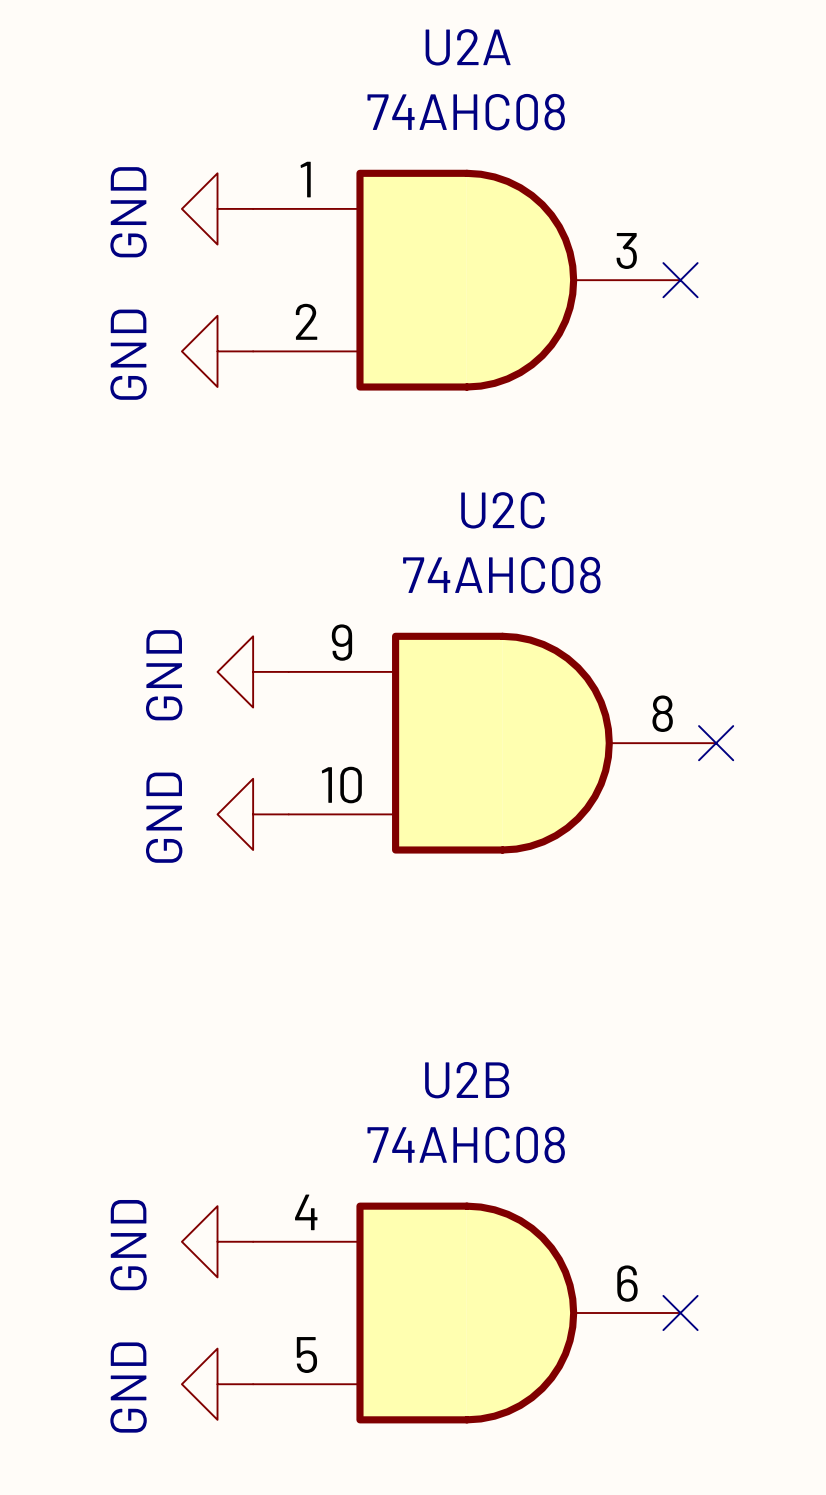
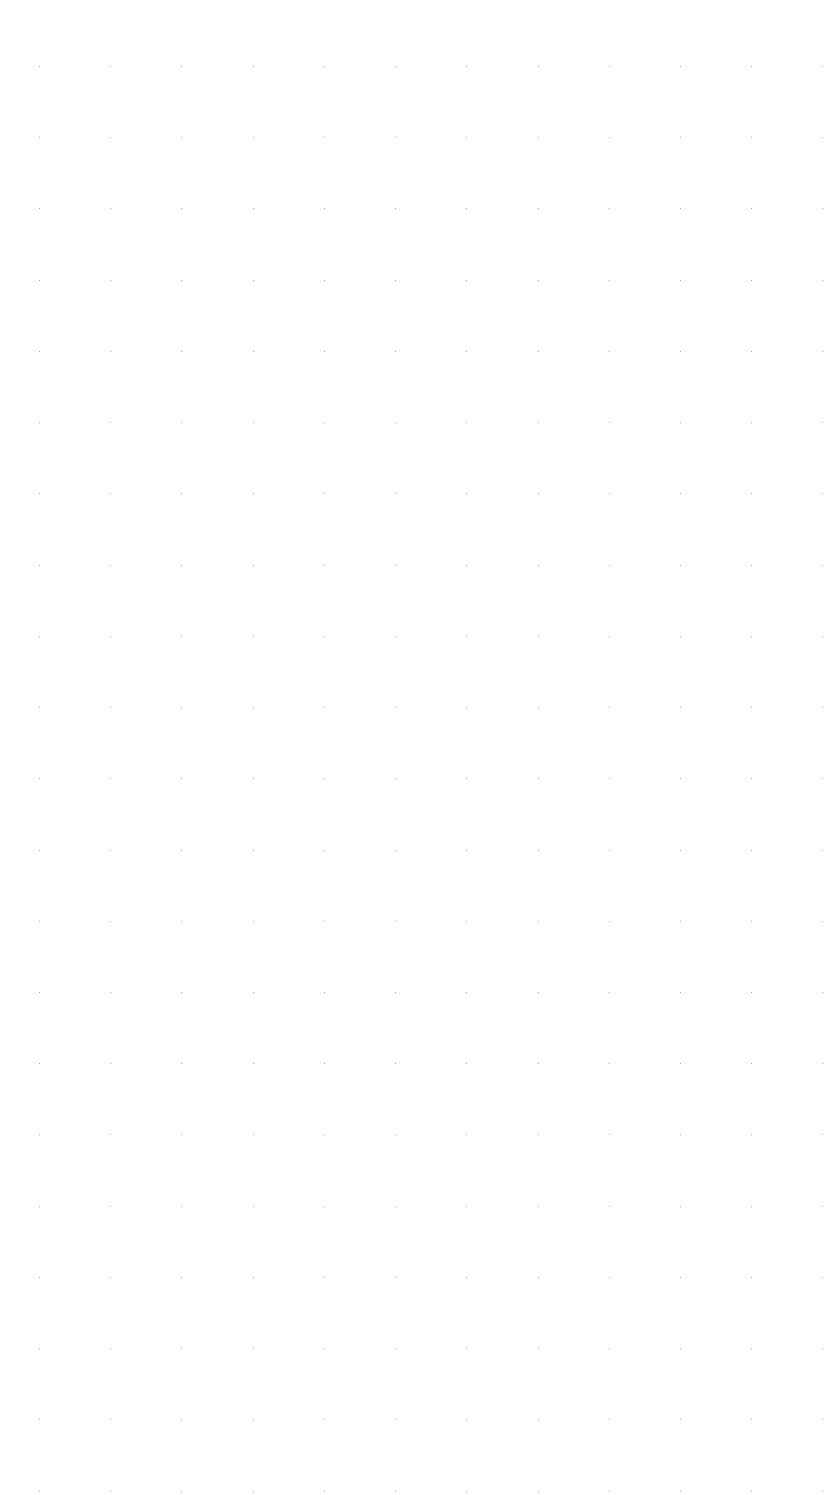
power symbol: GND (217, 208) -> none
U2A: 74AHC08 (466, 280) -> none
no-connect mark: (680, 280) -> none
power symbol: GND (217, 351) -> none
power symbol: GND (253, 671) -> none
U2C: 74AHC08 (502, 743) -> none
no-connect mark: (716, 743) -> none
power symbol: GND (253, 814) -> none
power symbol: GND (217, 1241) -> none
U2B: 74AHC08 (466, 1313) -> none
no-connect mark: (680, 1313) -> none
power symbol: GND (217, 1384) -> none

